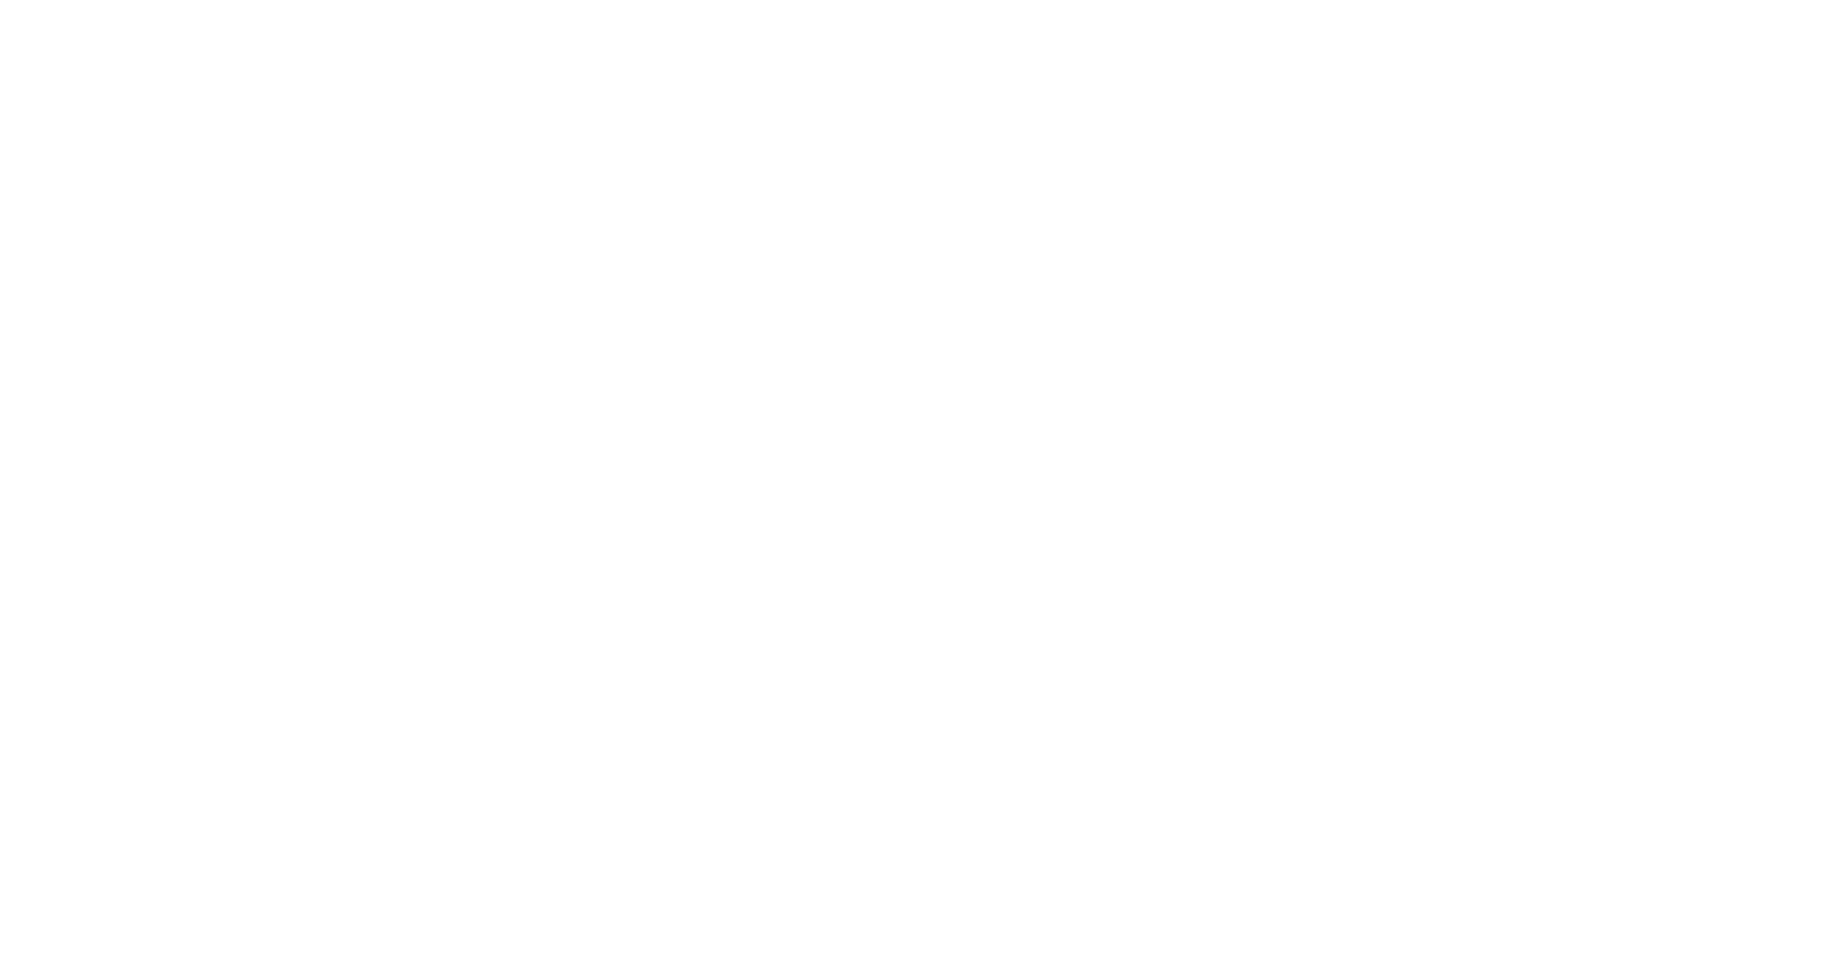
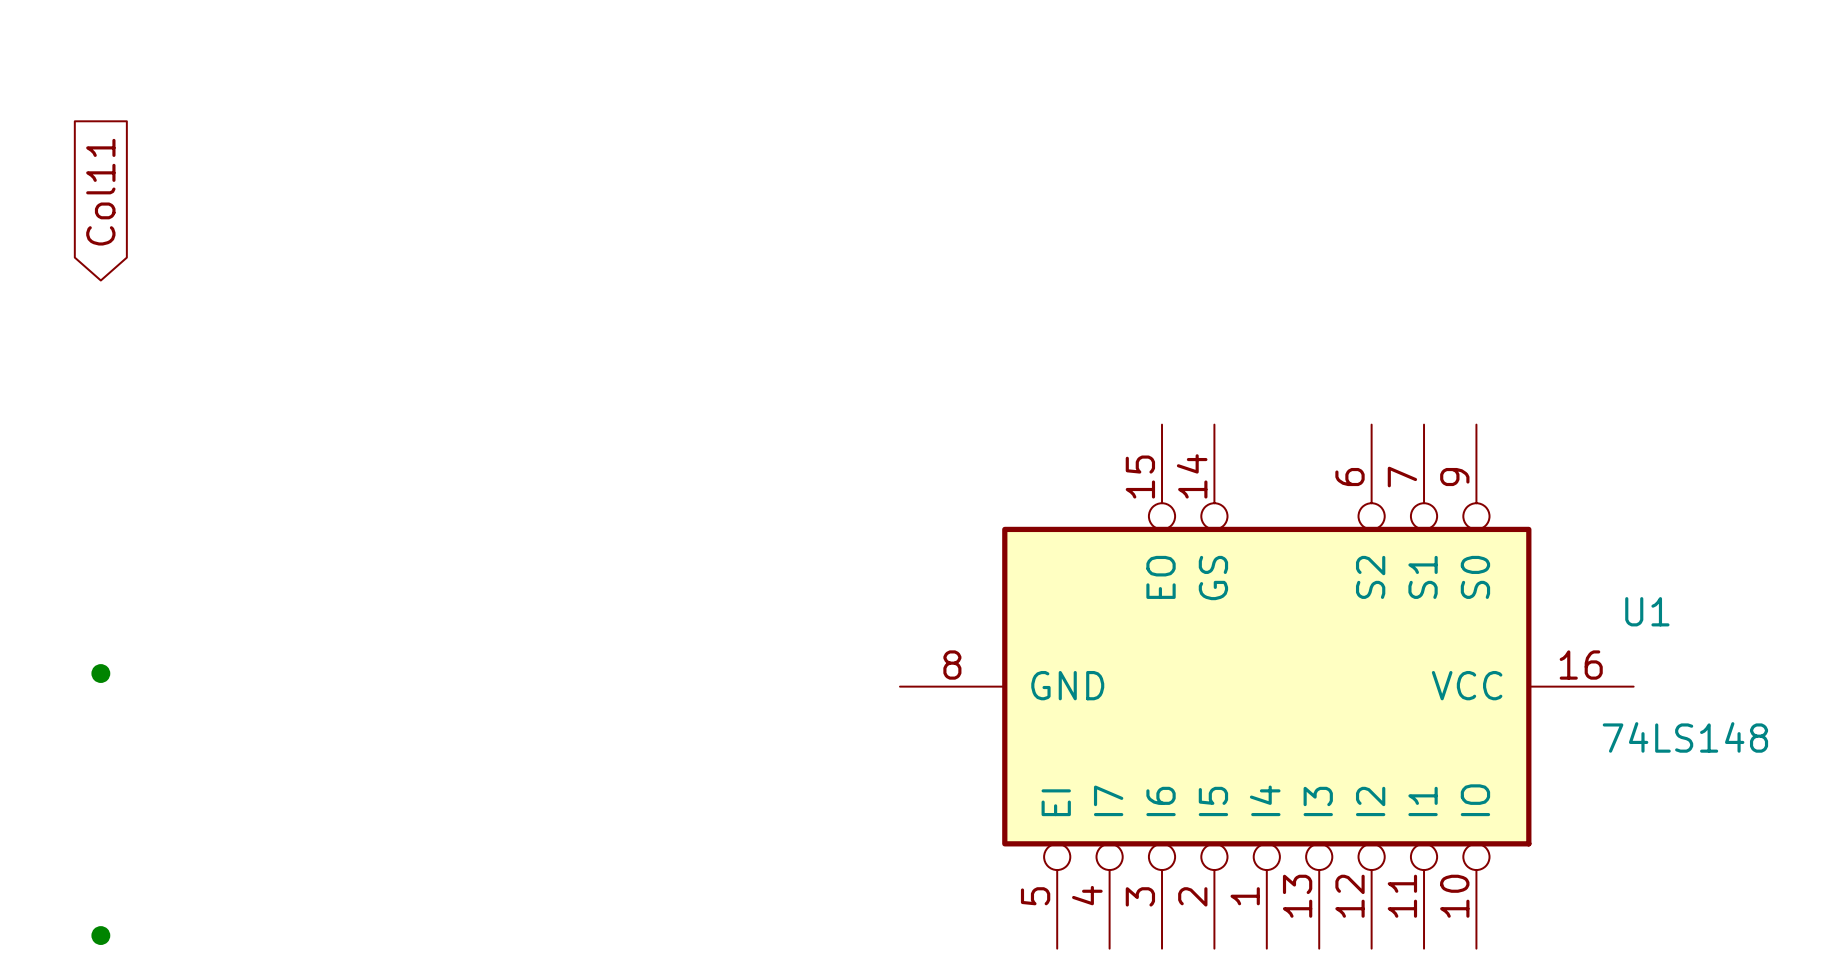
global label: none -> Col11 (100, 192)
junction: none -> (100, 673)
U1: none -> 74LS148 (1266, 686)
junction: none -> (100, 935)

